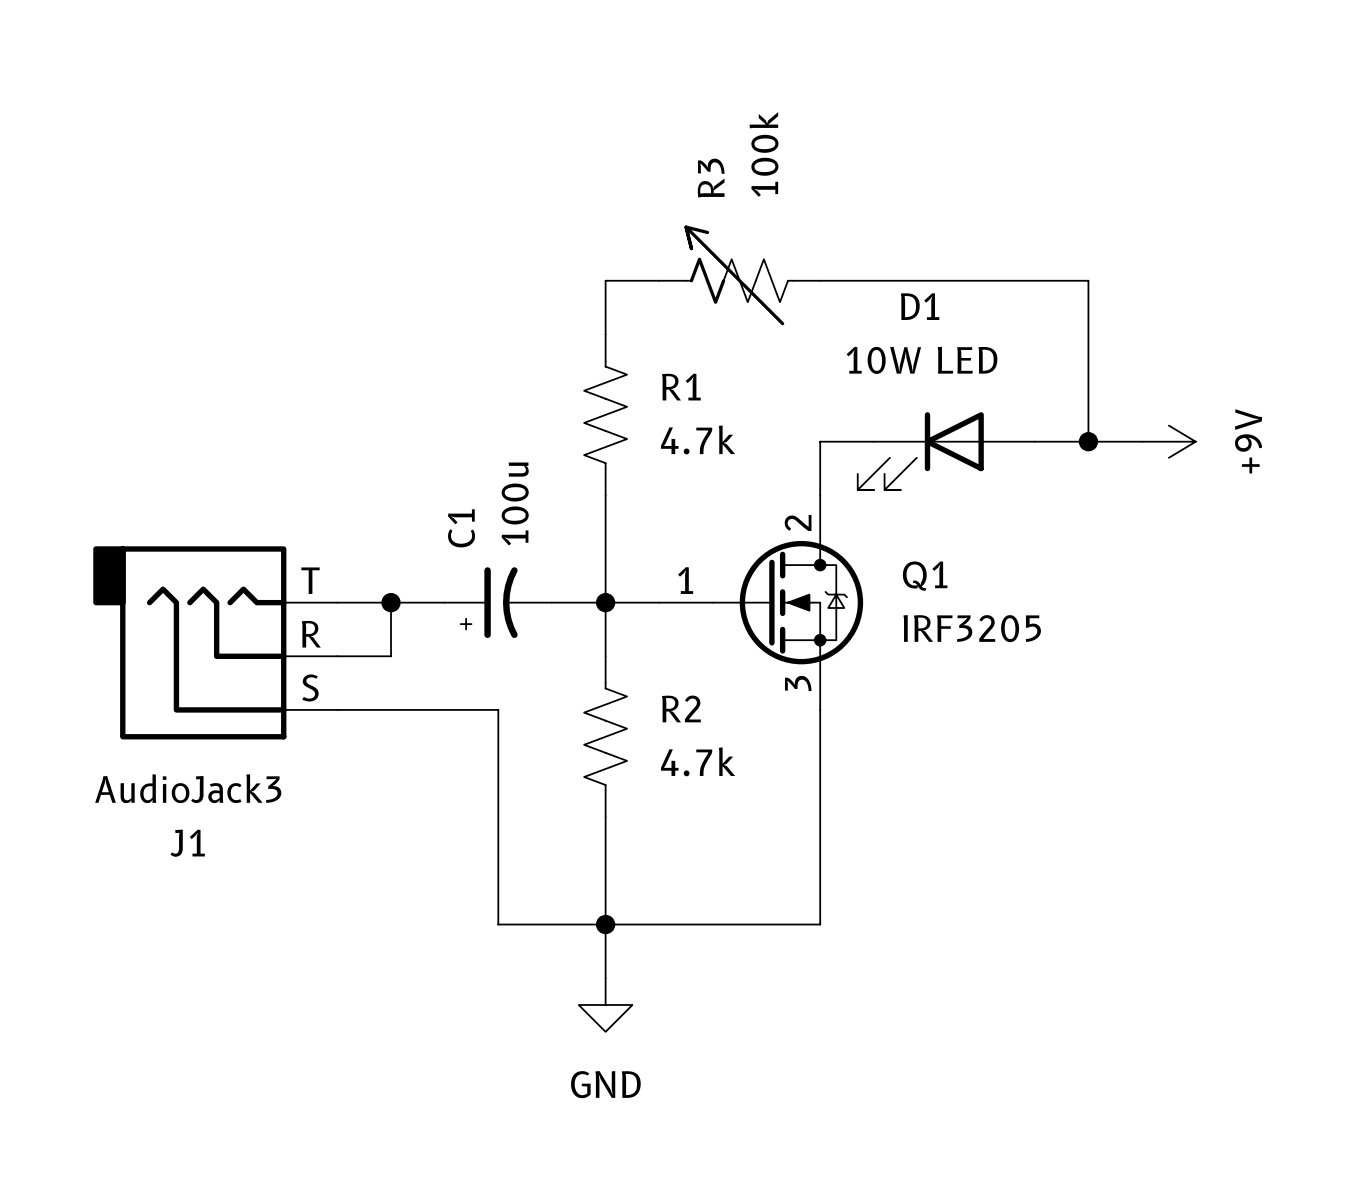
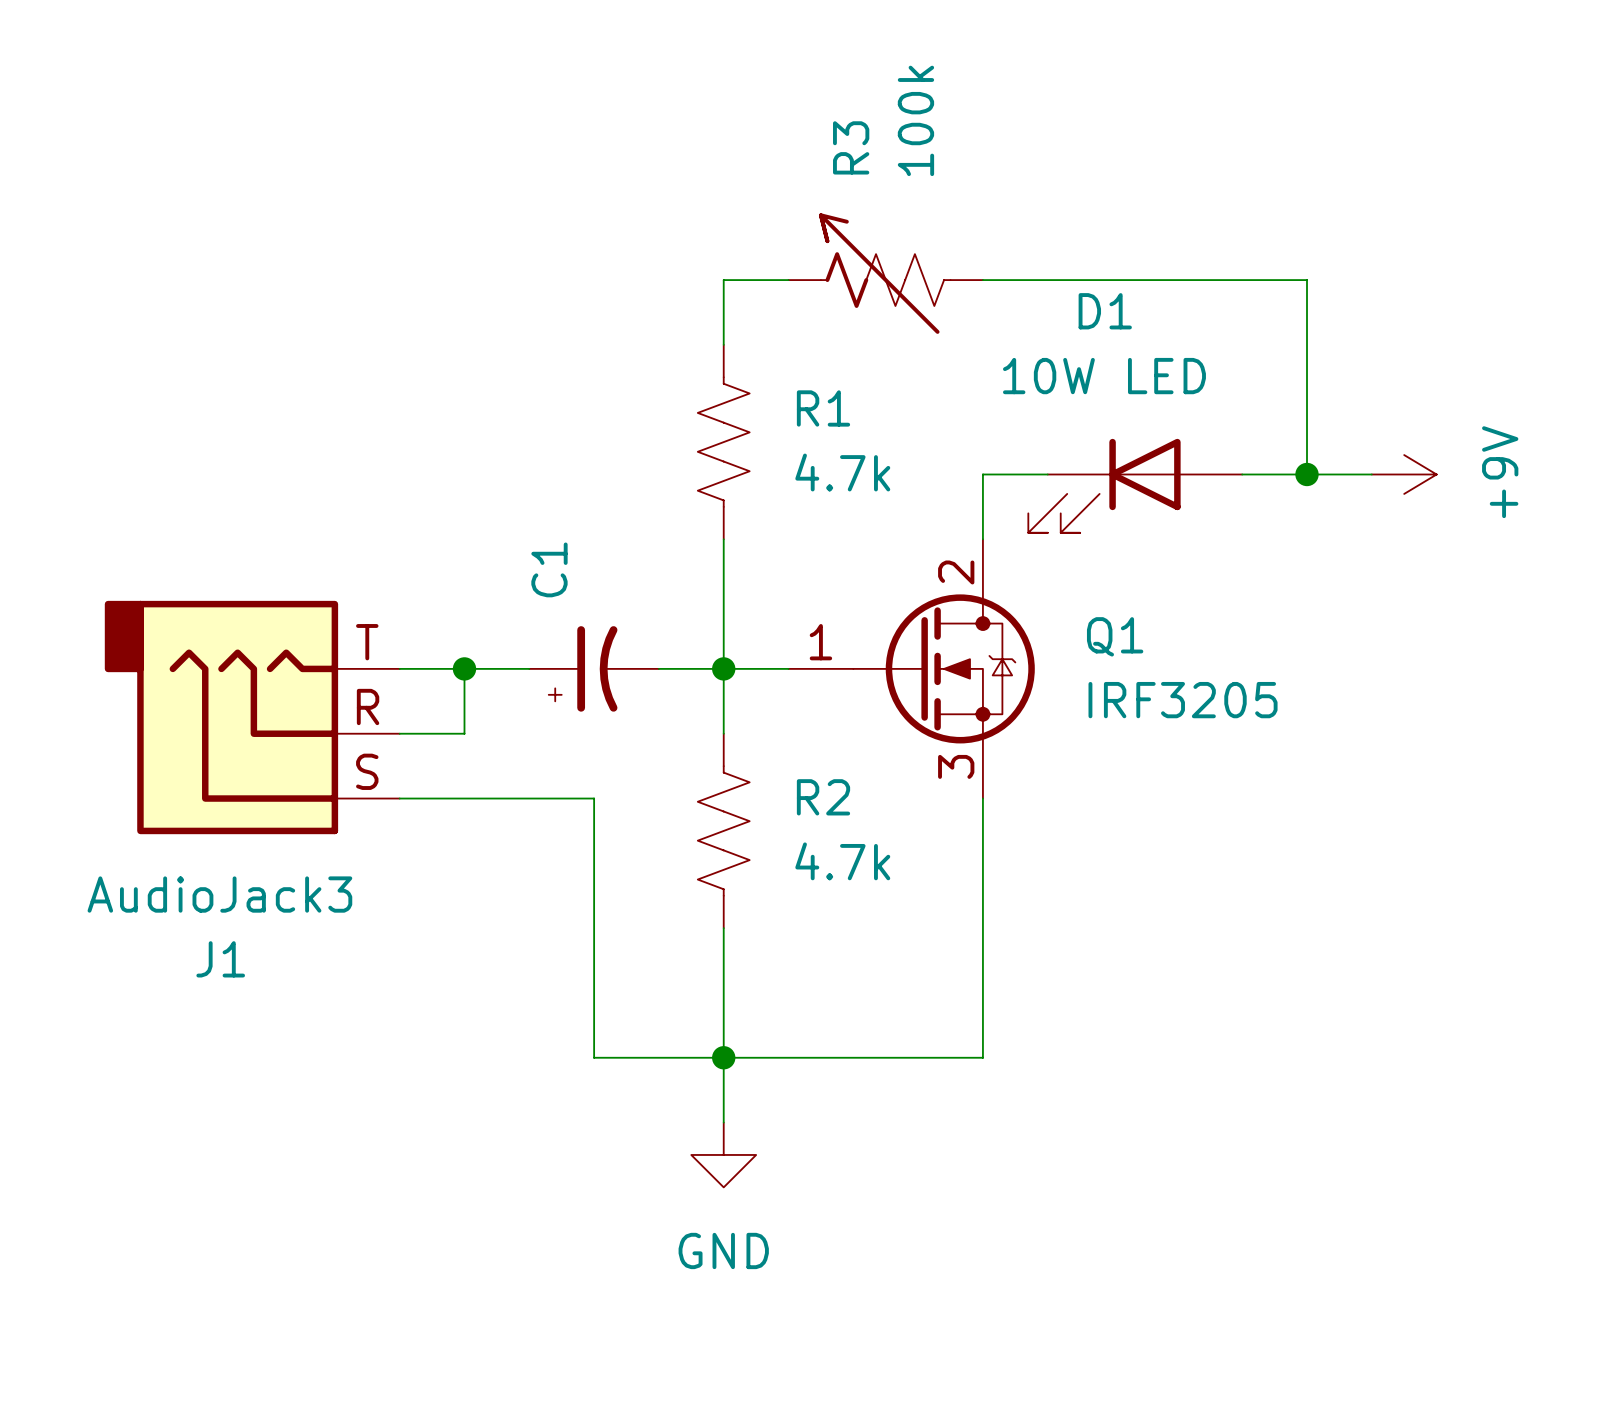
C1 value: 100u (515, 504) -> none

